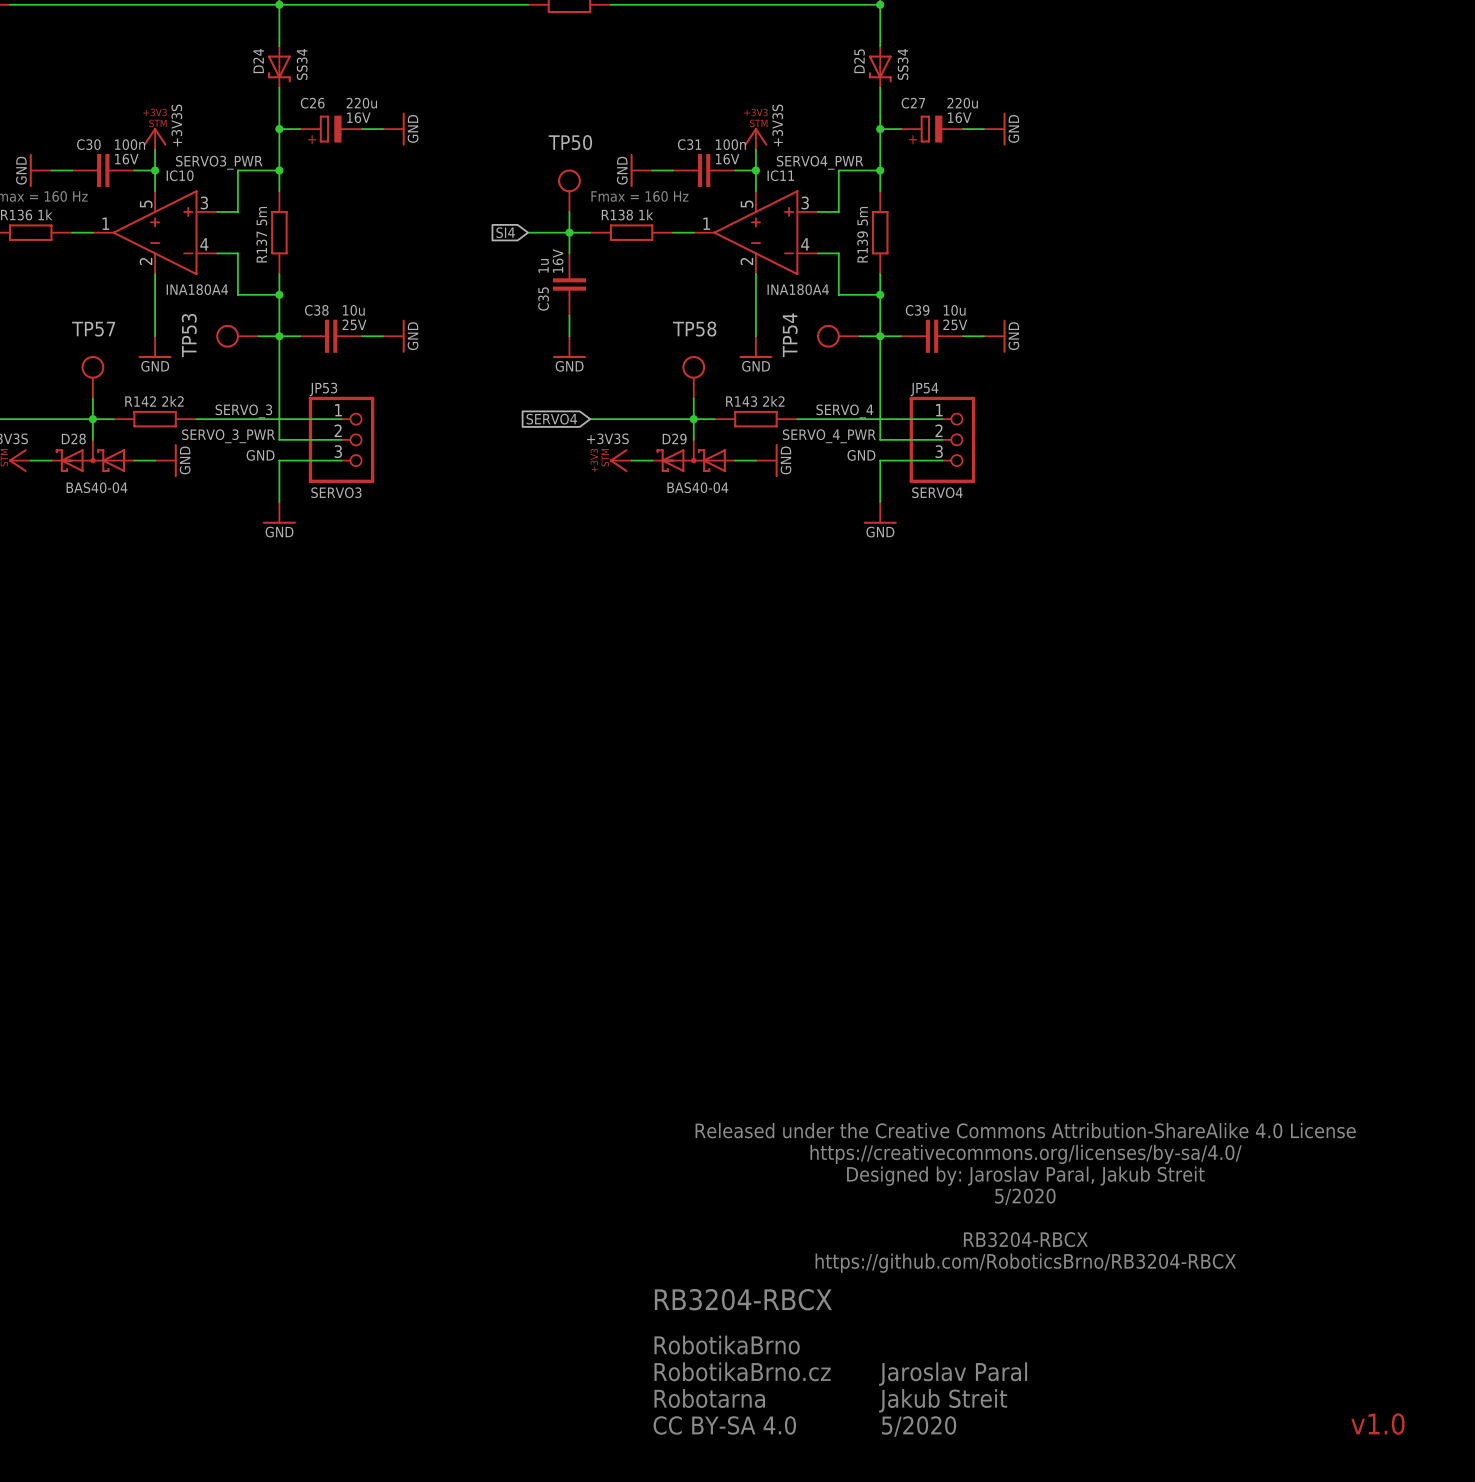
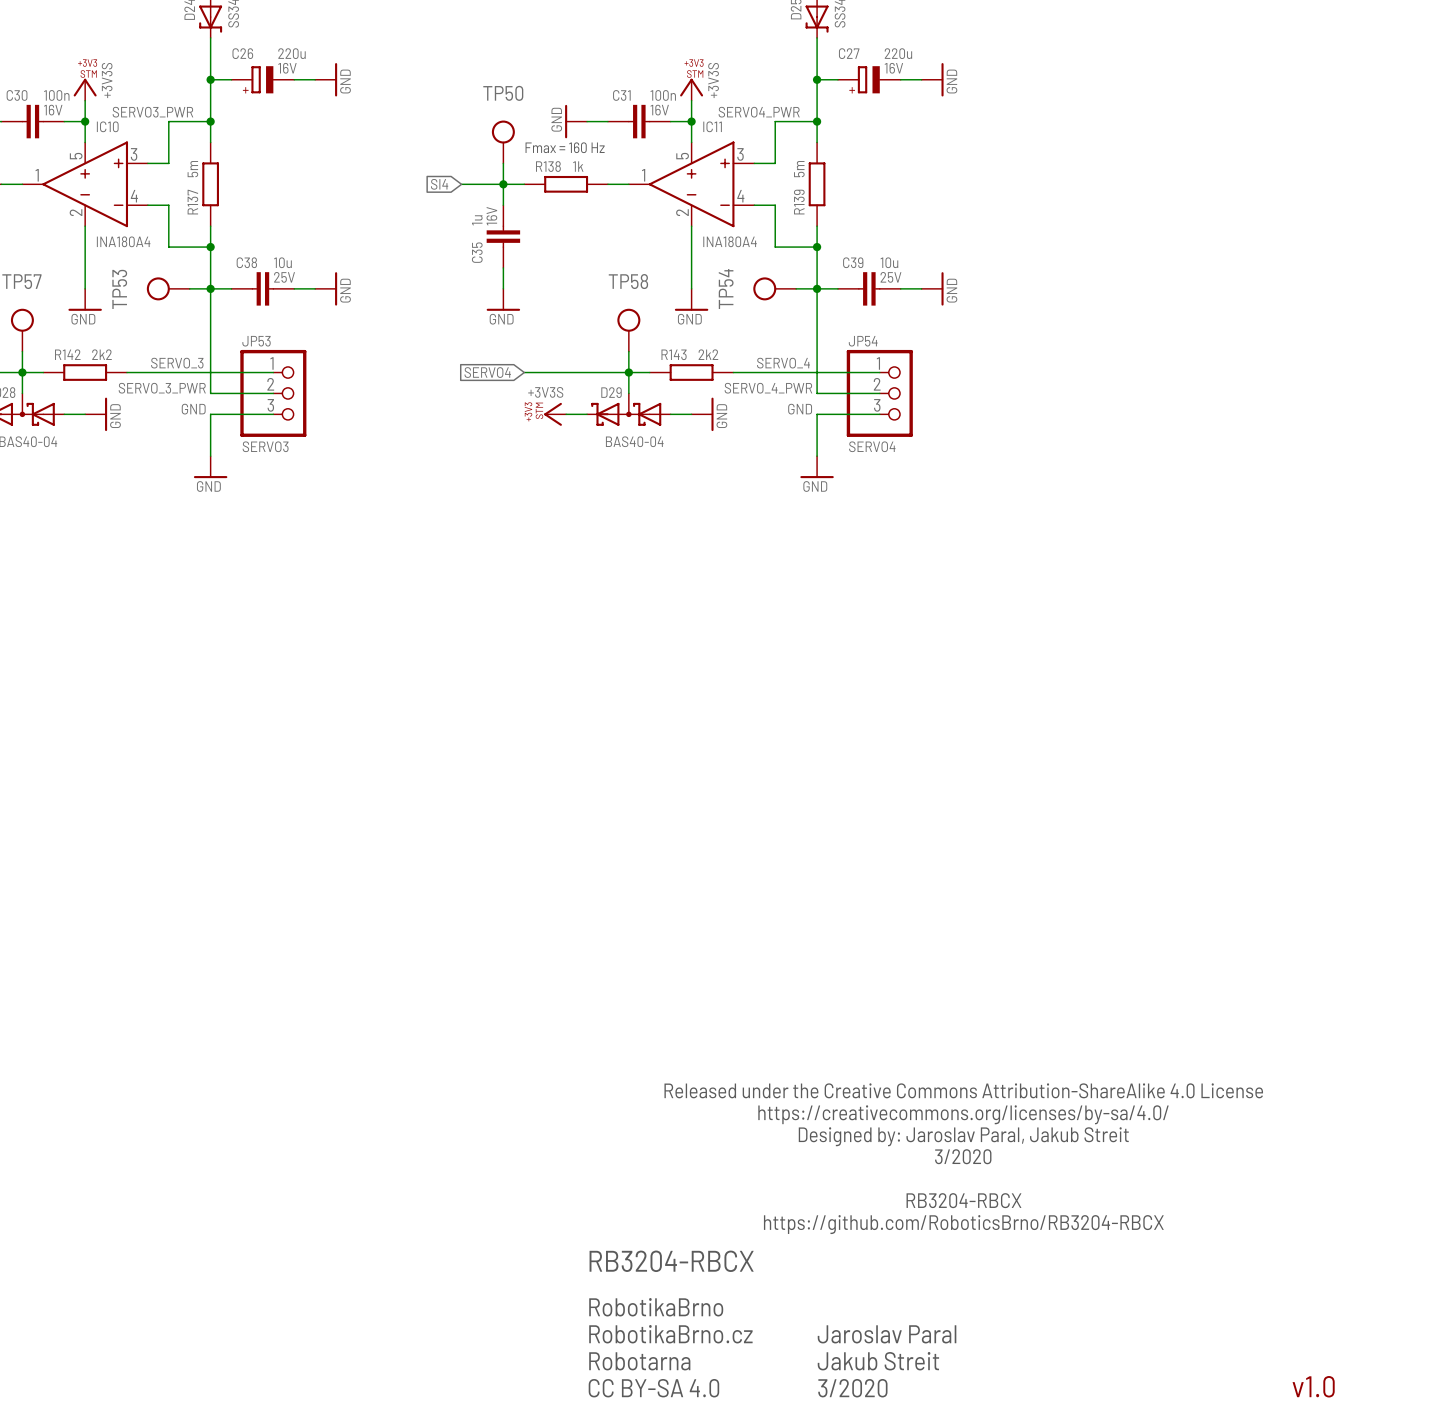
text: 5/2020 (1025, 1196) -> 3/2020 (963, 1156)
text: 5/2020 (919, 1426) -> 3/2020 (852, 1388)

